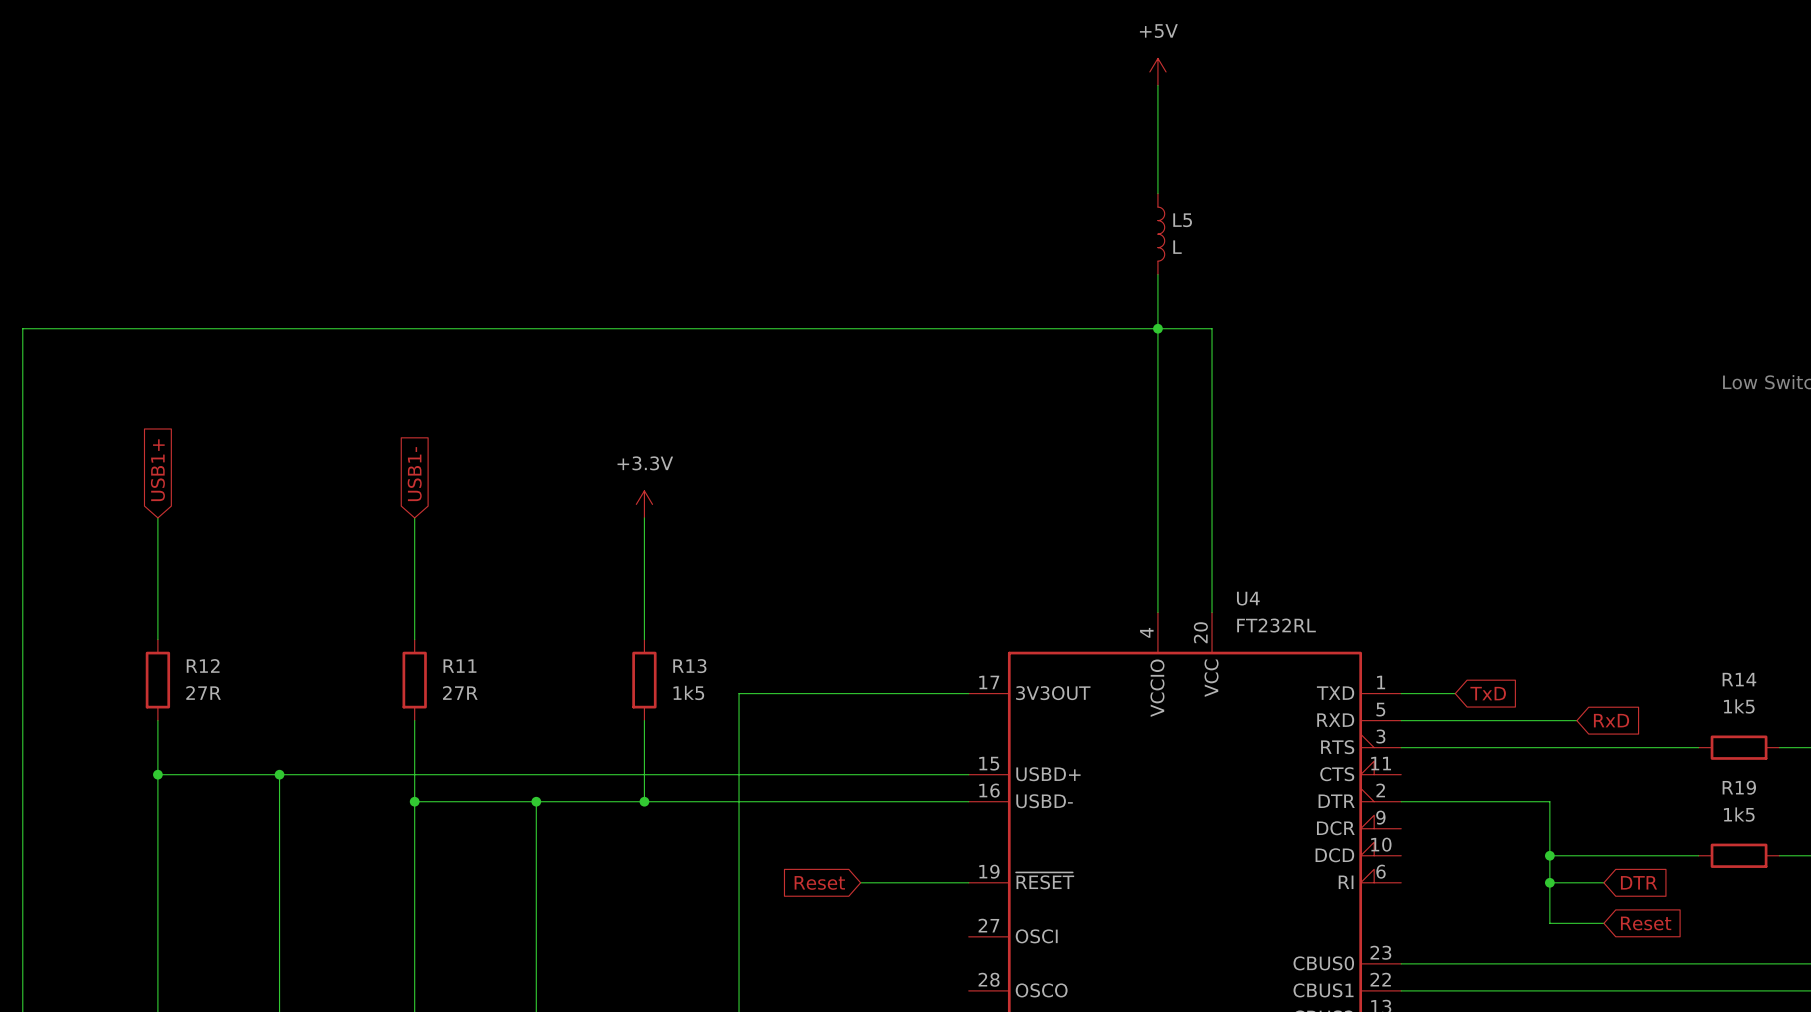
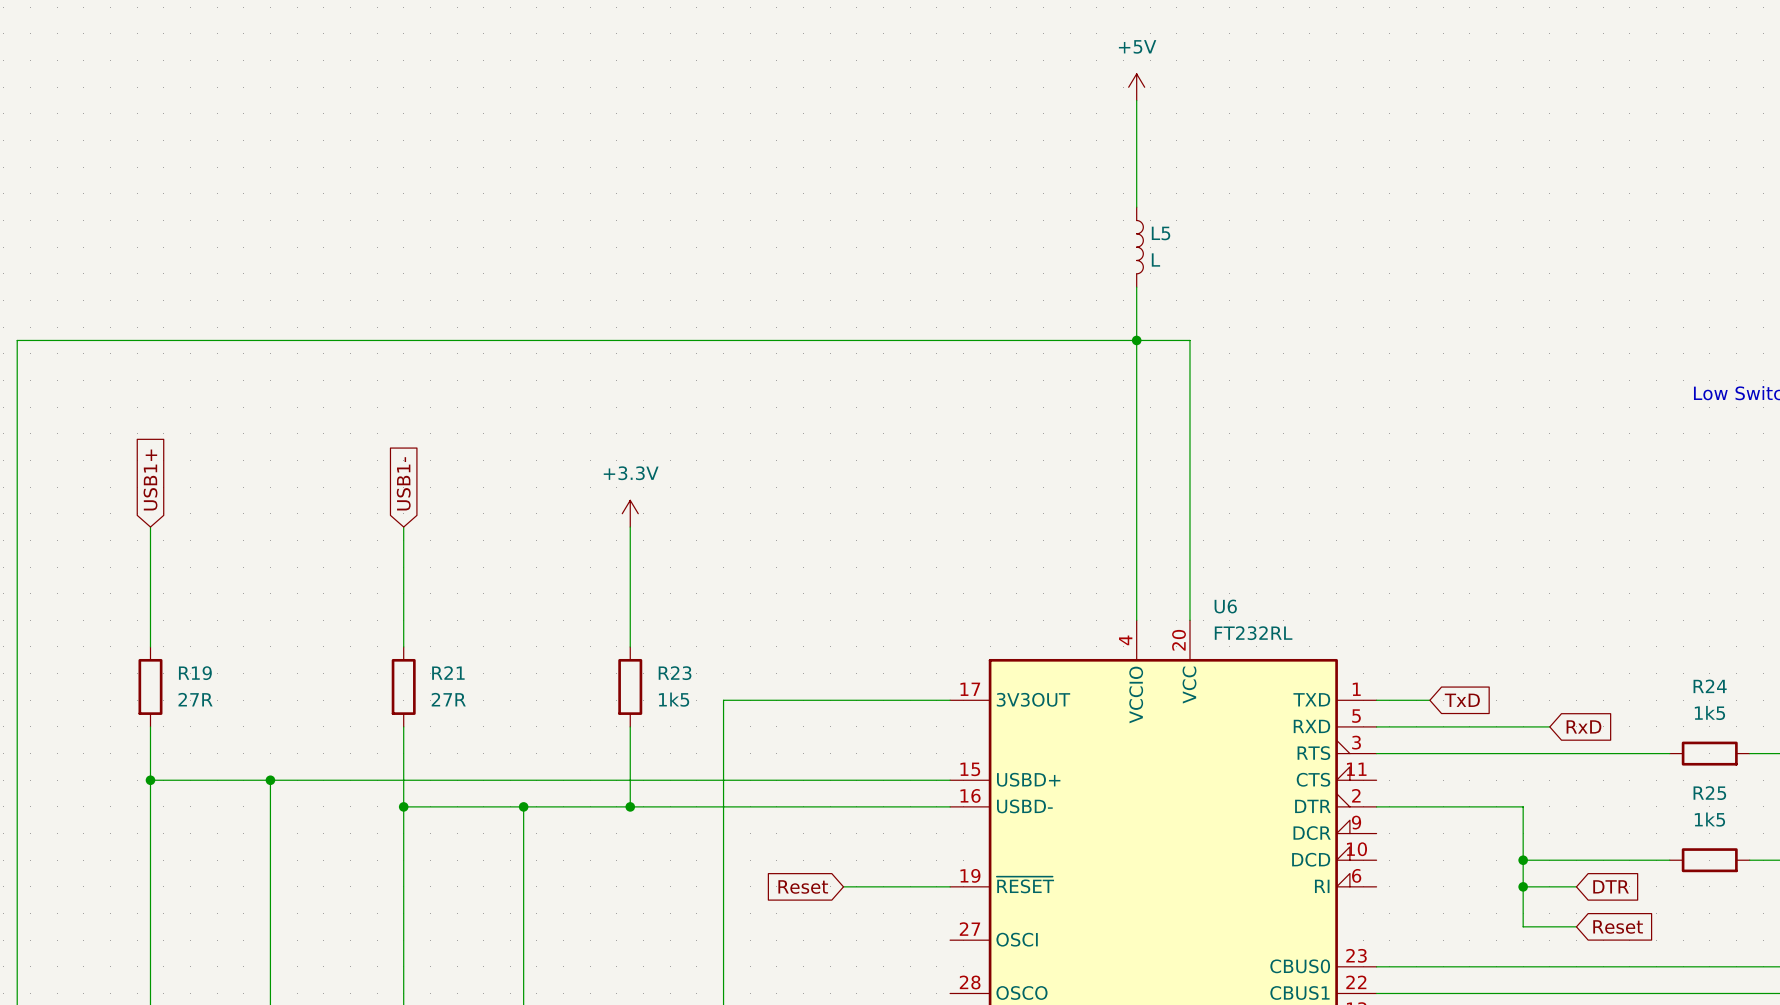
U4 name: U4 (1248, 598) -> U6 (1225, 606)
R12 name: R12 (203, 665) -> R19 (195, 673)
R11 name: R11 (459, 666) -> R21 (448, 673)
R13 name: R13 (689, 666) -> R23 (675, 673)
R14 name: R14 (1739, 679) -> R24 (1710, 686)
R19 name: R19 (1739, 787) -> R25 (1709, 793)

